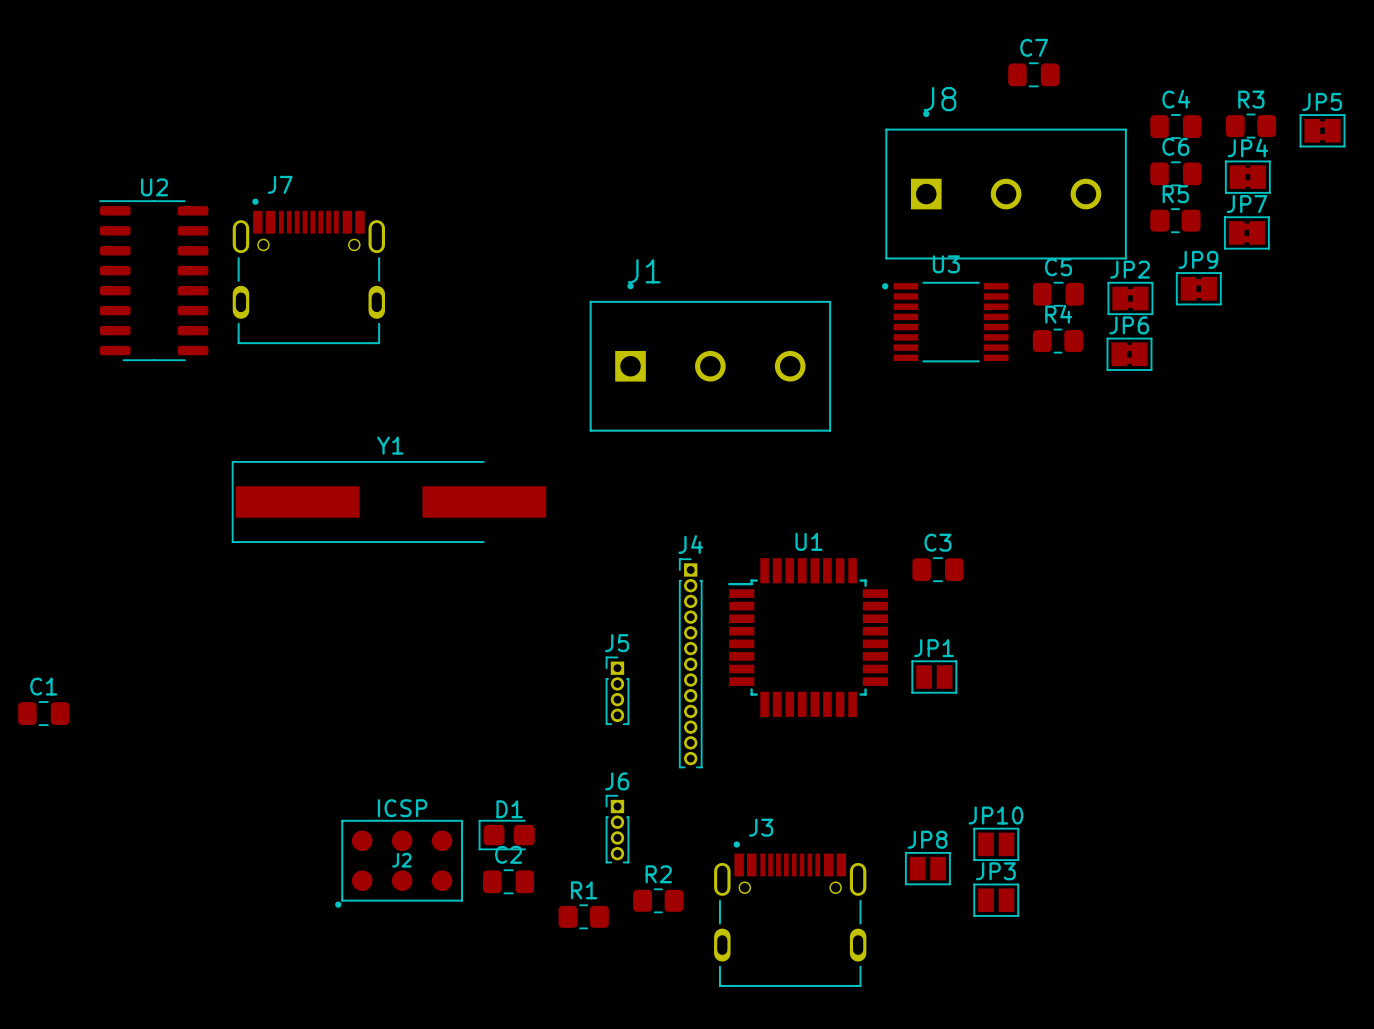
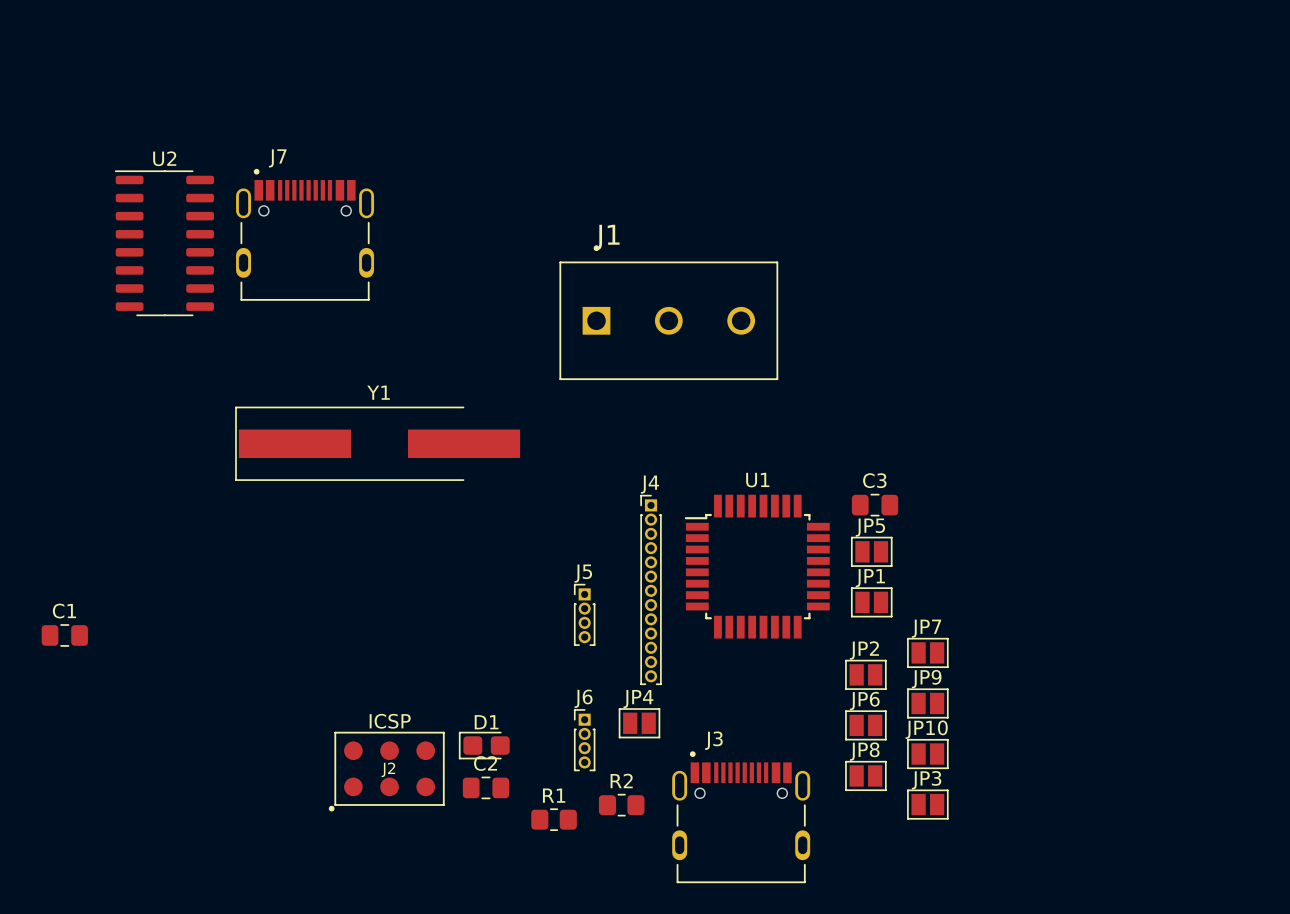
C7: (1033, 74) -> none
JP5 footprint: [1299, 114, 1346, 148] -> [850, 536, 893, 567]
C4: (1175, 126) -> none
R3: (1250, 126) -> none
JP4 footprint: [1224, 160, 1271, 194] -> [618, 708, 661, 739]
C6: (1175, 173) -> none
J8: (1006, 185) -> none
JP7 footprint: [1223, 216, 1270, 250] -> [907, 637, 949, 669]
R5: (1175, 220) -> none
JP9 footprint: [1175, 272, 1222, 306] -> [907, 688, 949, 719]
JP2 footprint: [1107, 281, 1154, 316] -> [845, 659, 887, 690]
C5: (1058, 294) -> none
U3: (945, 322) -> none
JP6 footprint: [1106, 337, 1153, 371] -> [845, 710, 887, 741]
R4: (1057, 341) -> none

